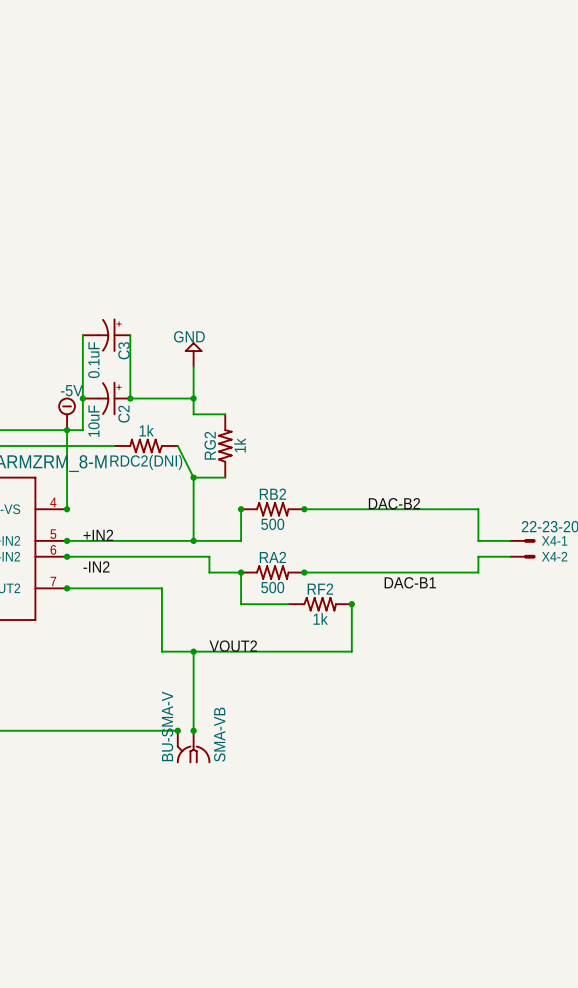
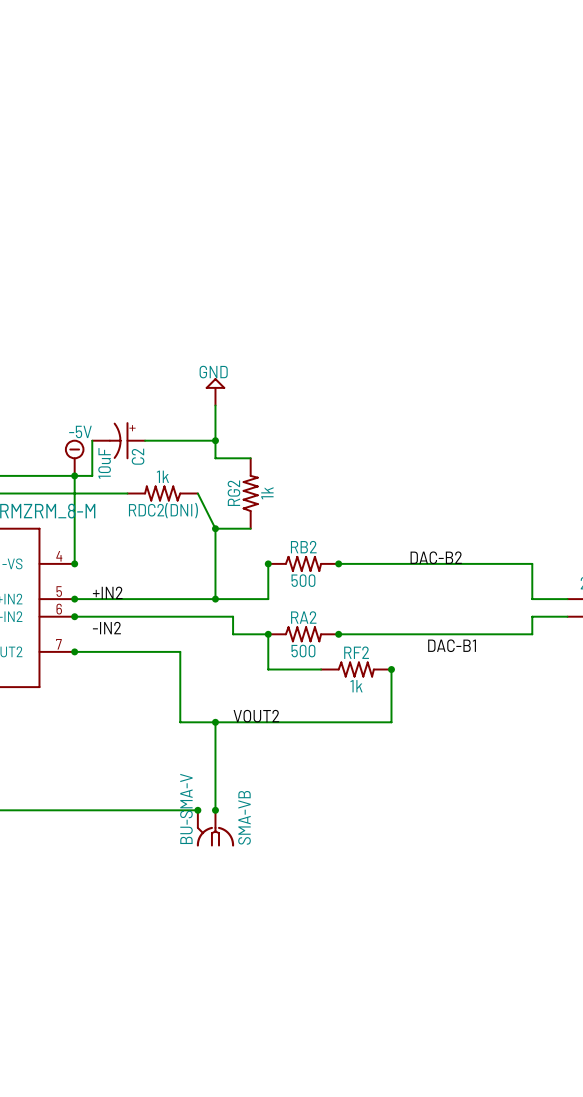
wire: (82, 335) (82, 398) -> none
C3: 0.1uF (106, 335) -> none
wire: (130, 335) (130, 398) -> none
junction: (82, 398) -> none
junction: (130, 398) -> none

